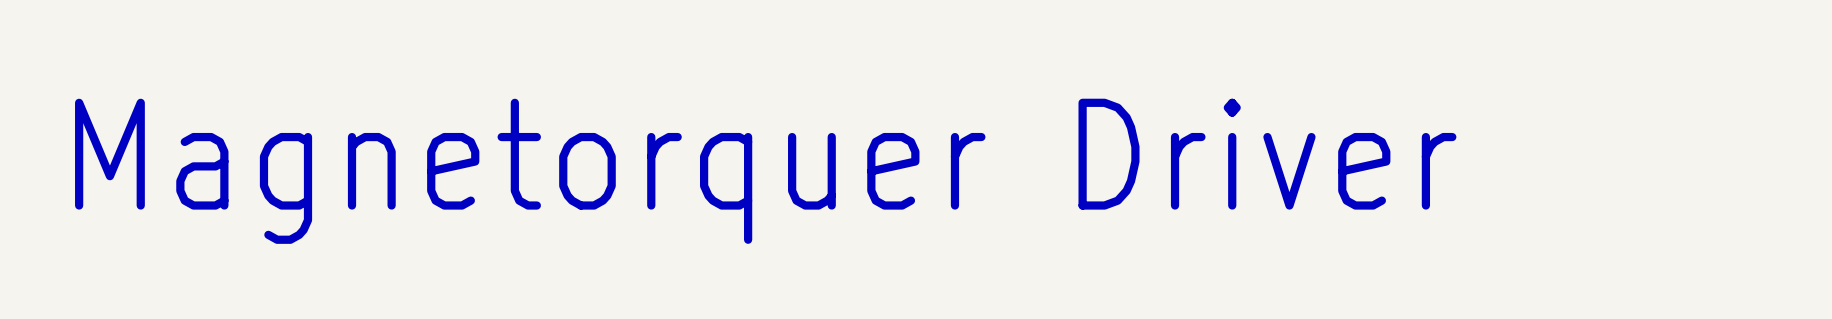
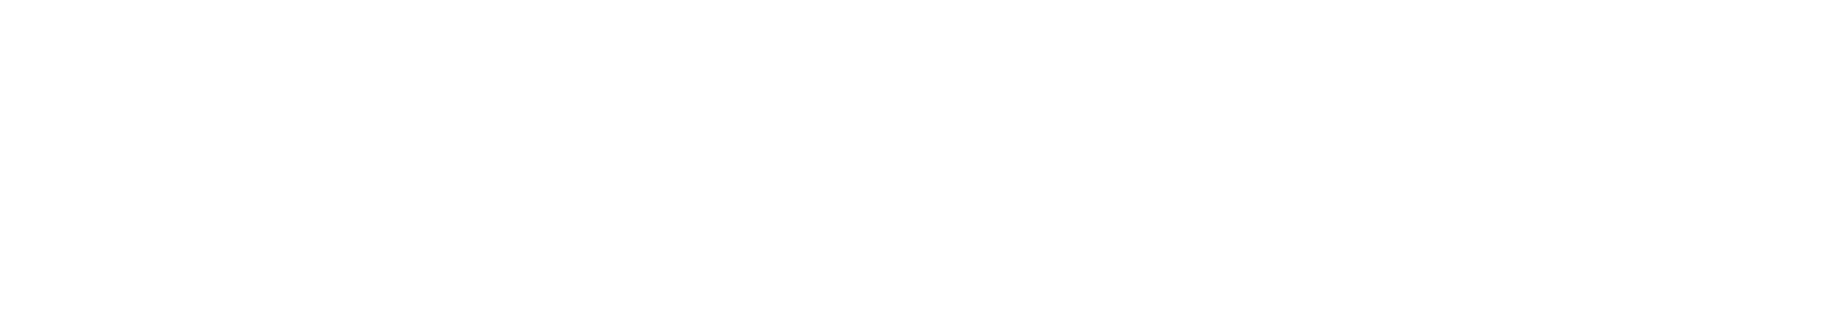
text: Magnetorquer Driver (765, 171) -> none

